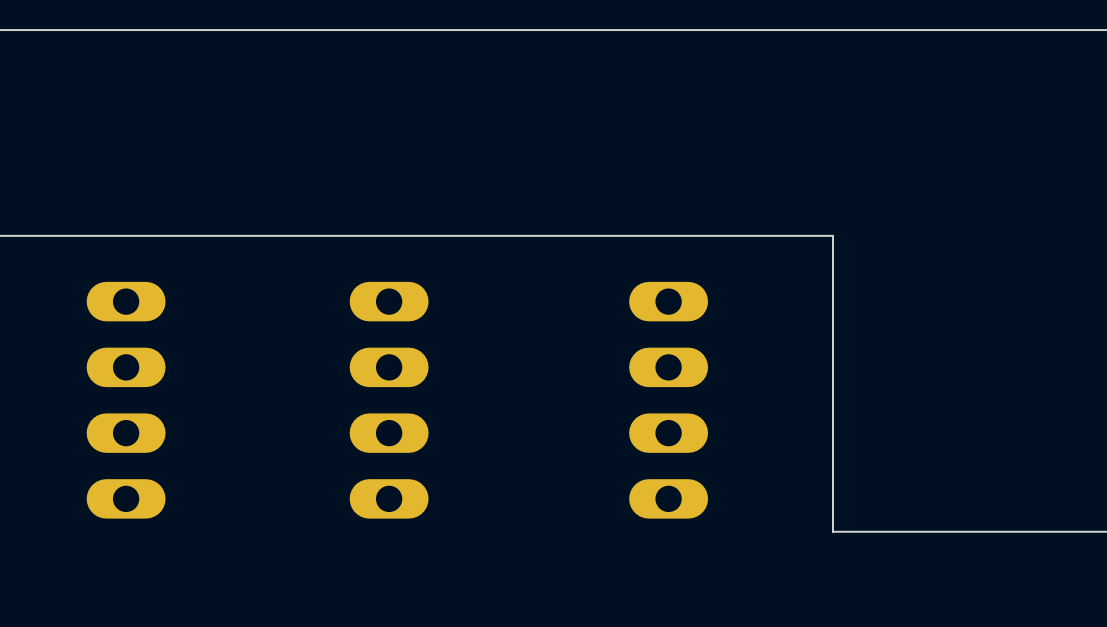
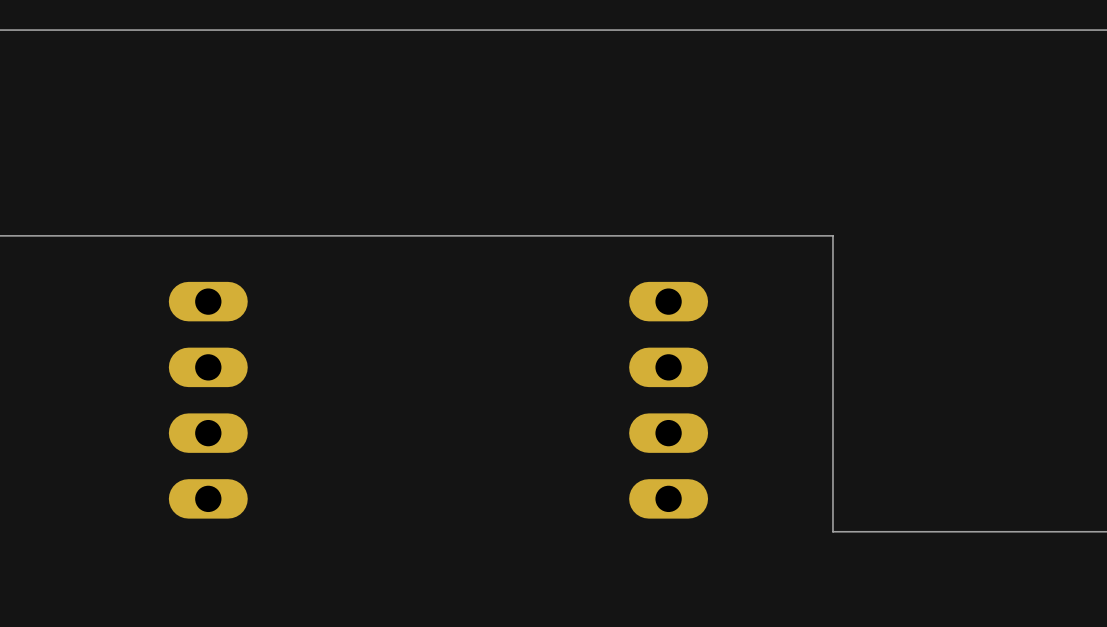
part position: (126, 400) -> (208, 400)
part: (389, 400) -> none

